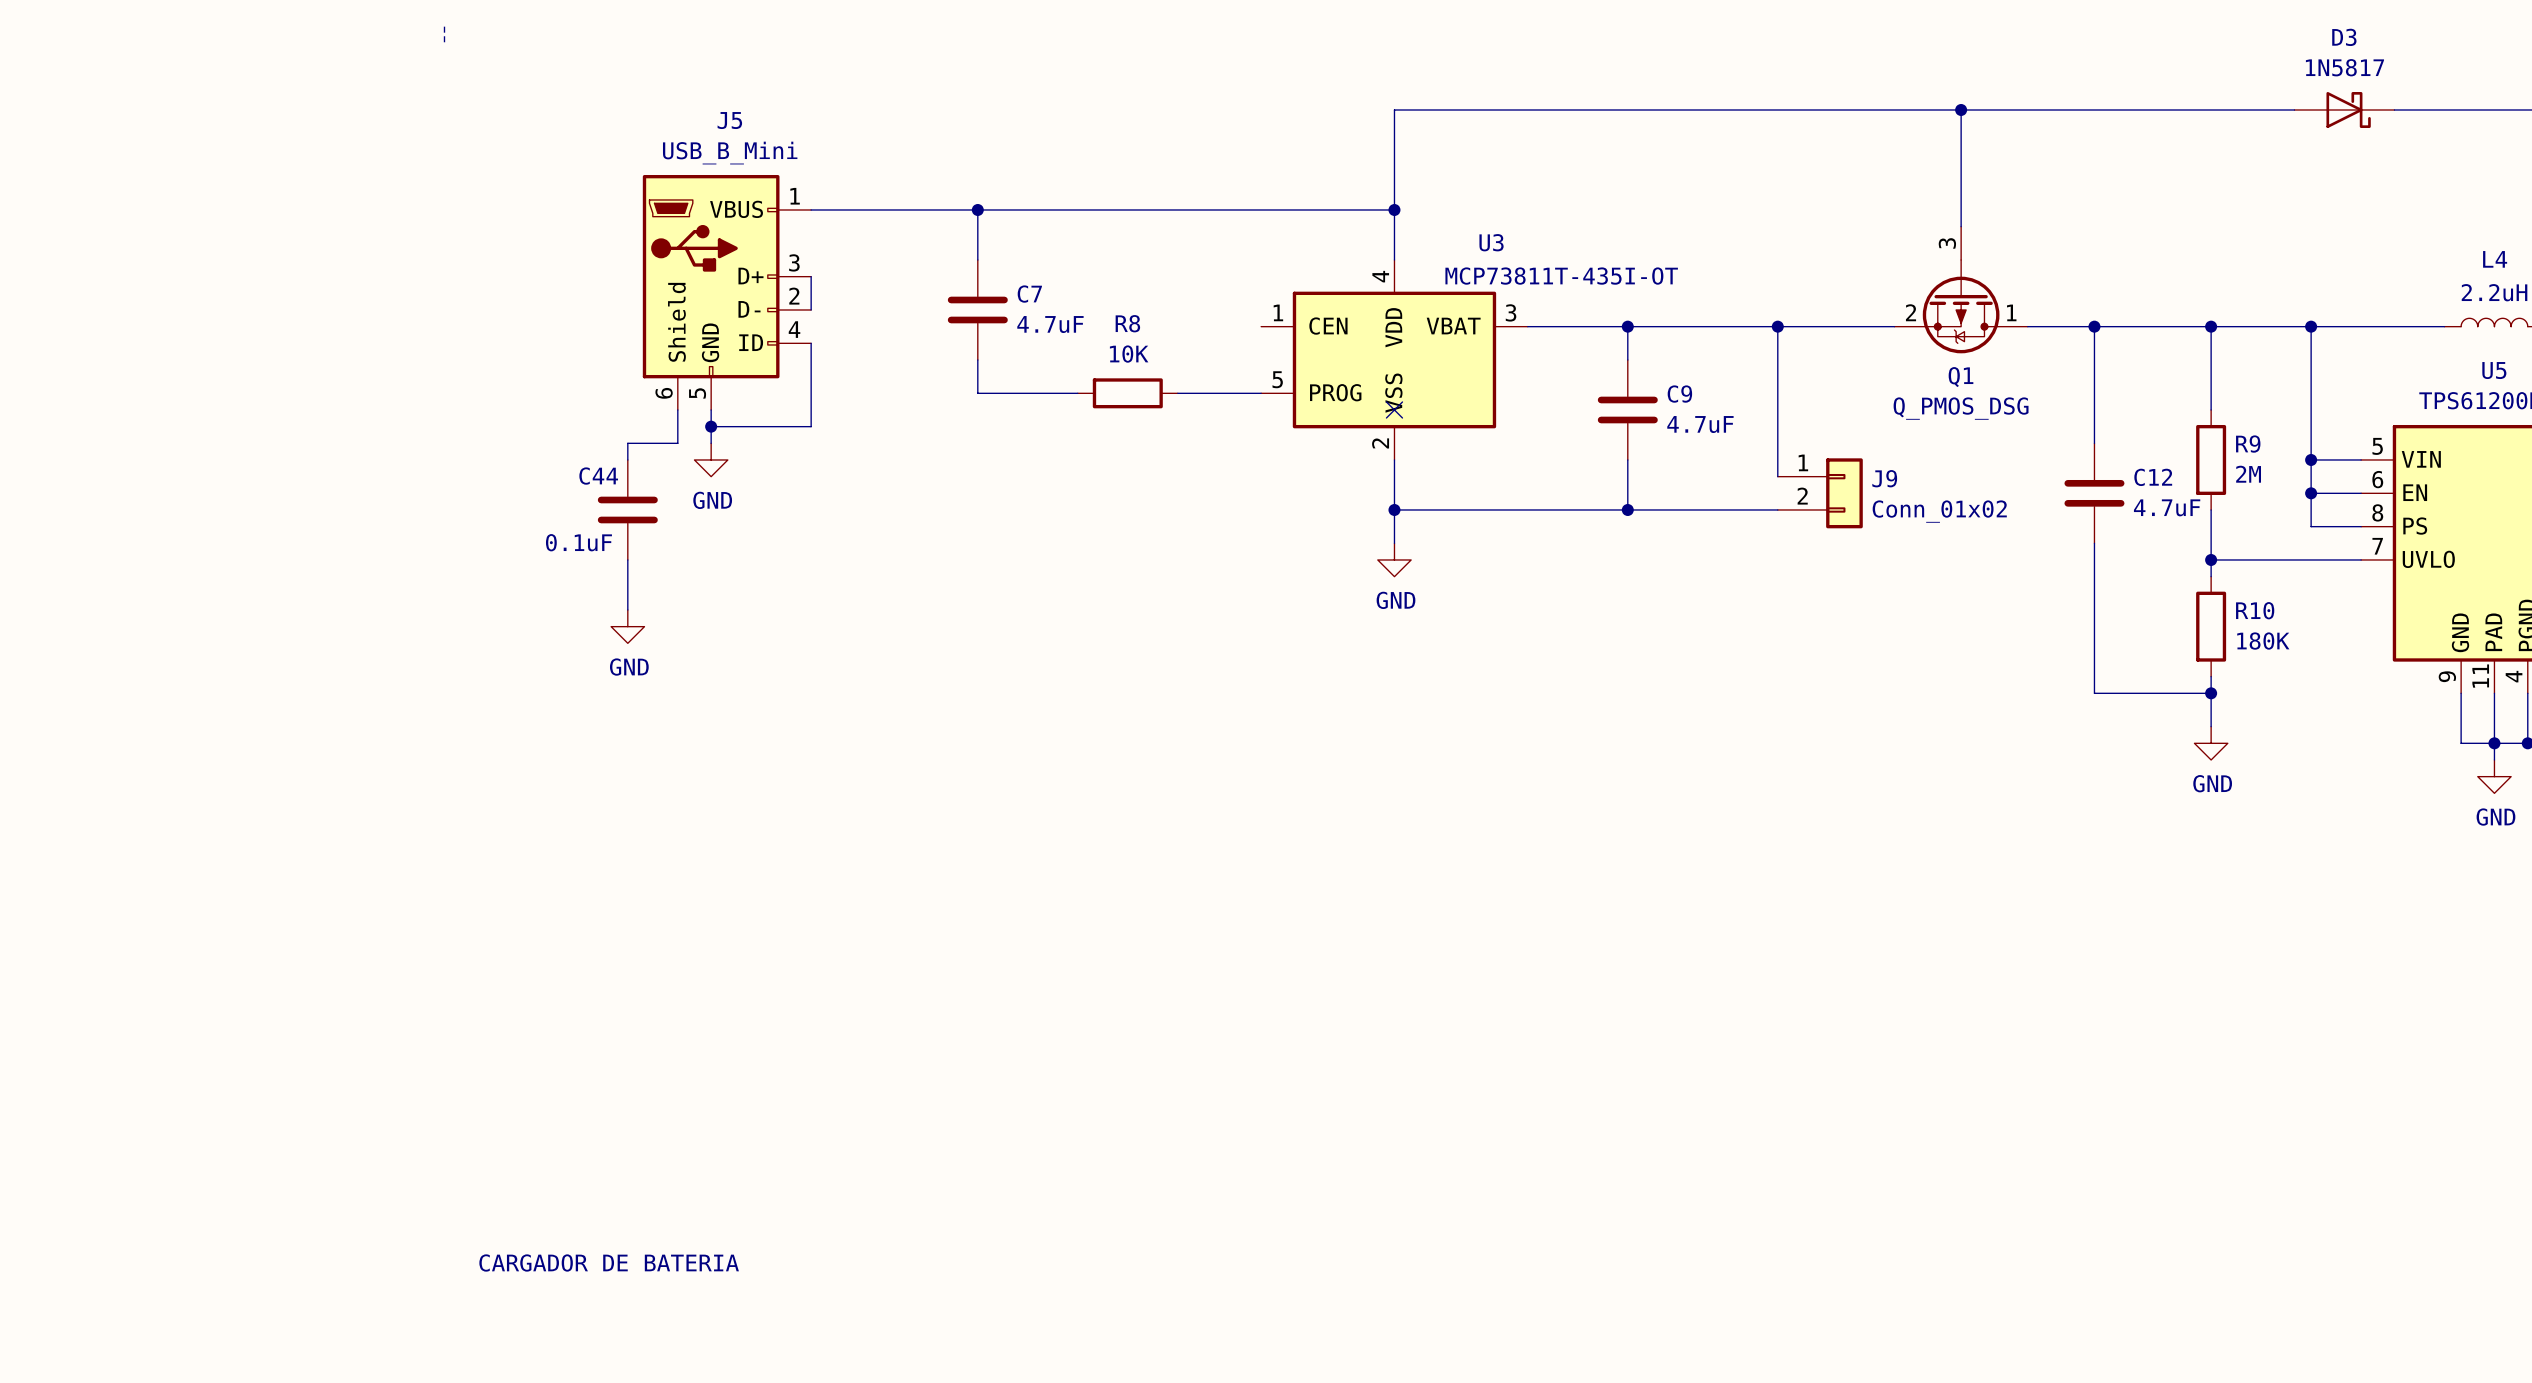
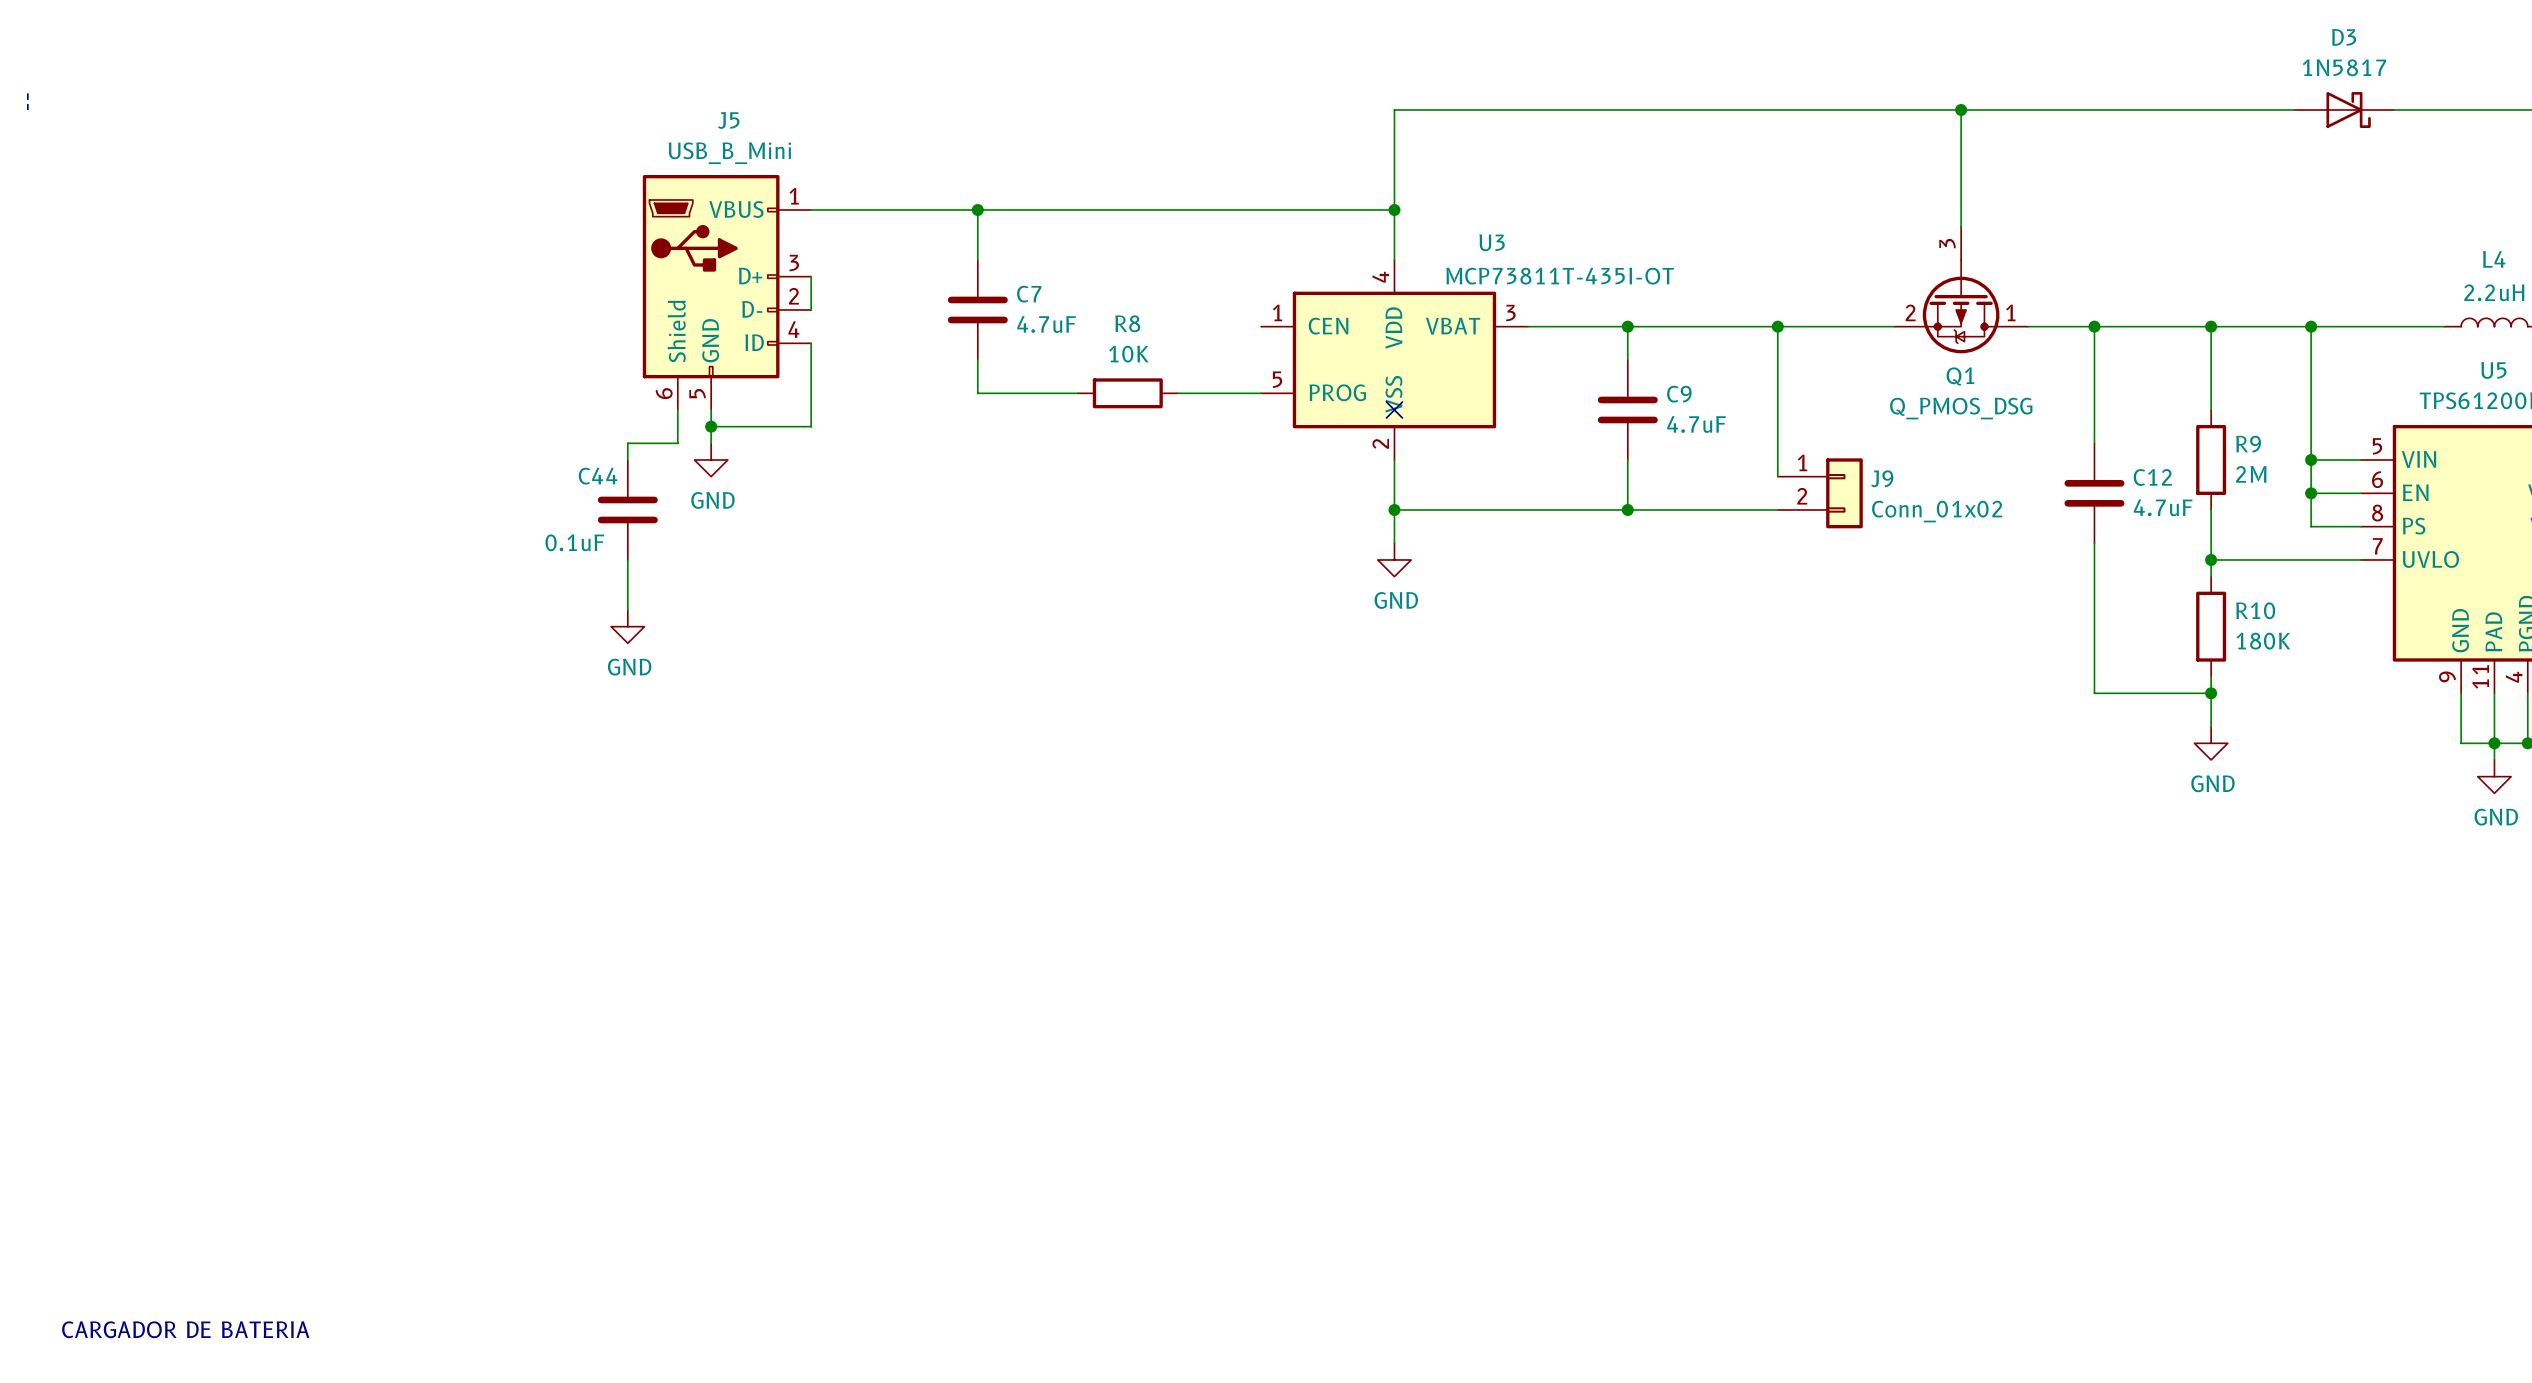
line: (444, 26) (444, 43) -> none
line: none -> (27, 93) (27, 109)
text: CARGADOR DE BATERIA (609, 1263) -> none
text: none -> CARGADOR DE BATERIA (185, 1329)

